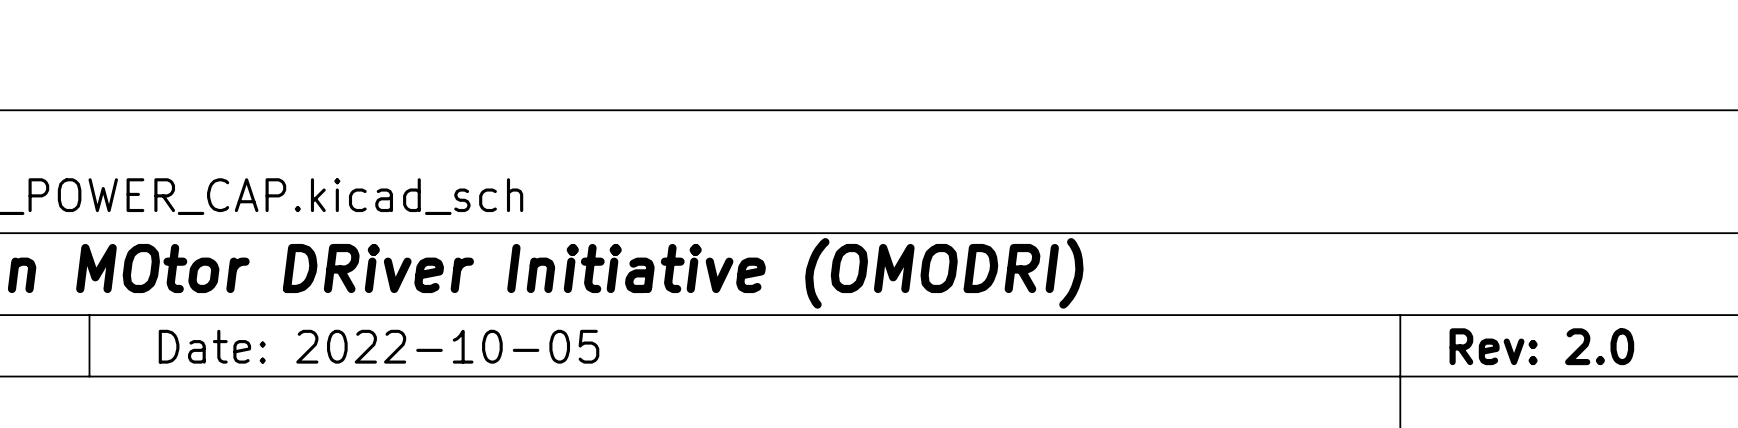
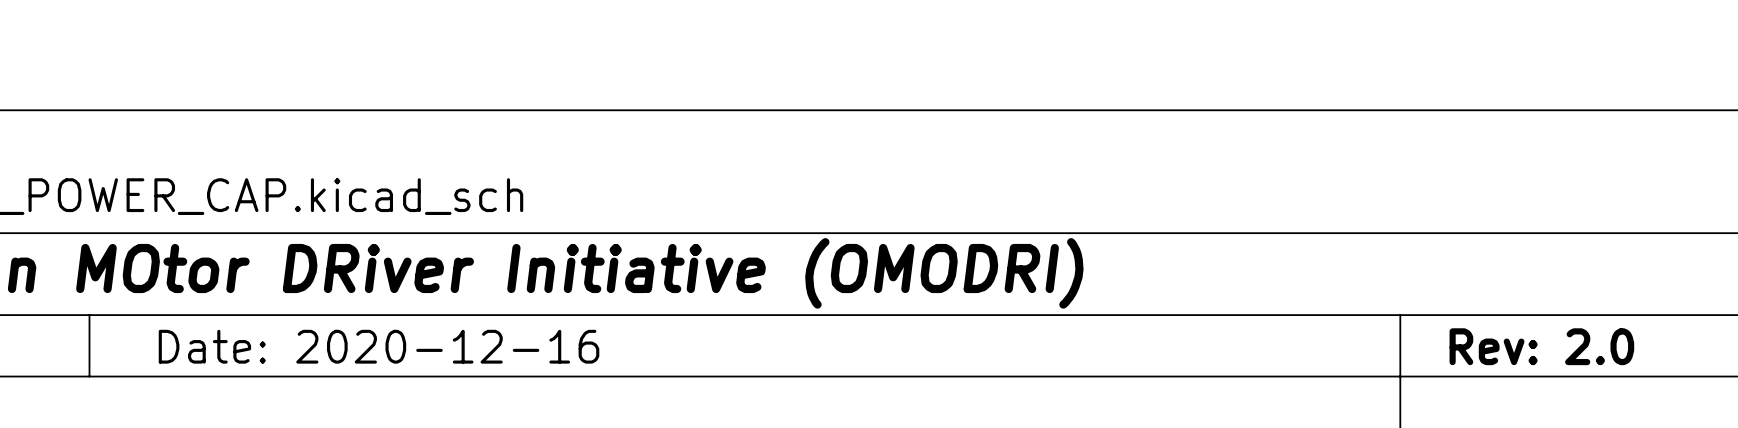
title block: Date: 2022-10-05 (379, 346) -> Date: 2020-12-16 (379, 346)

